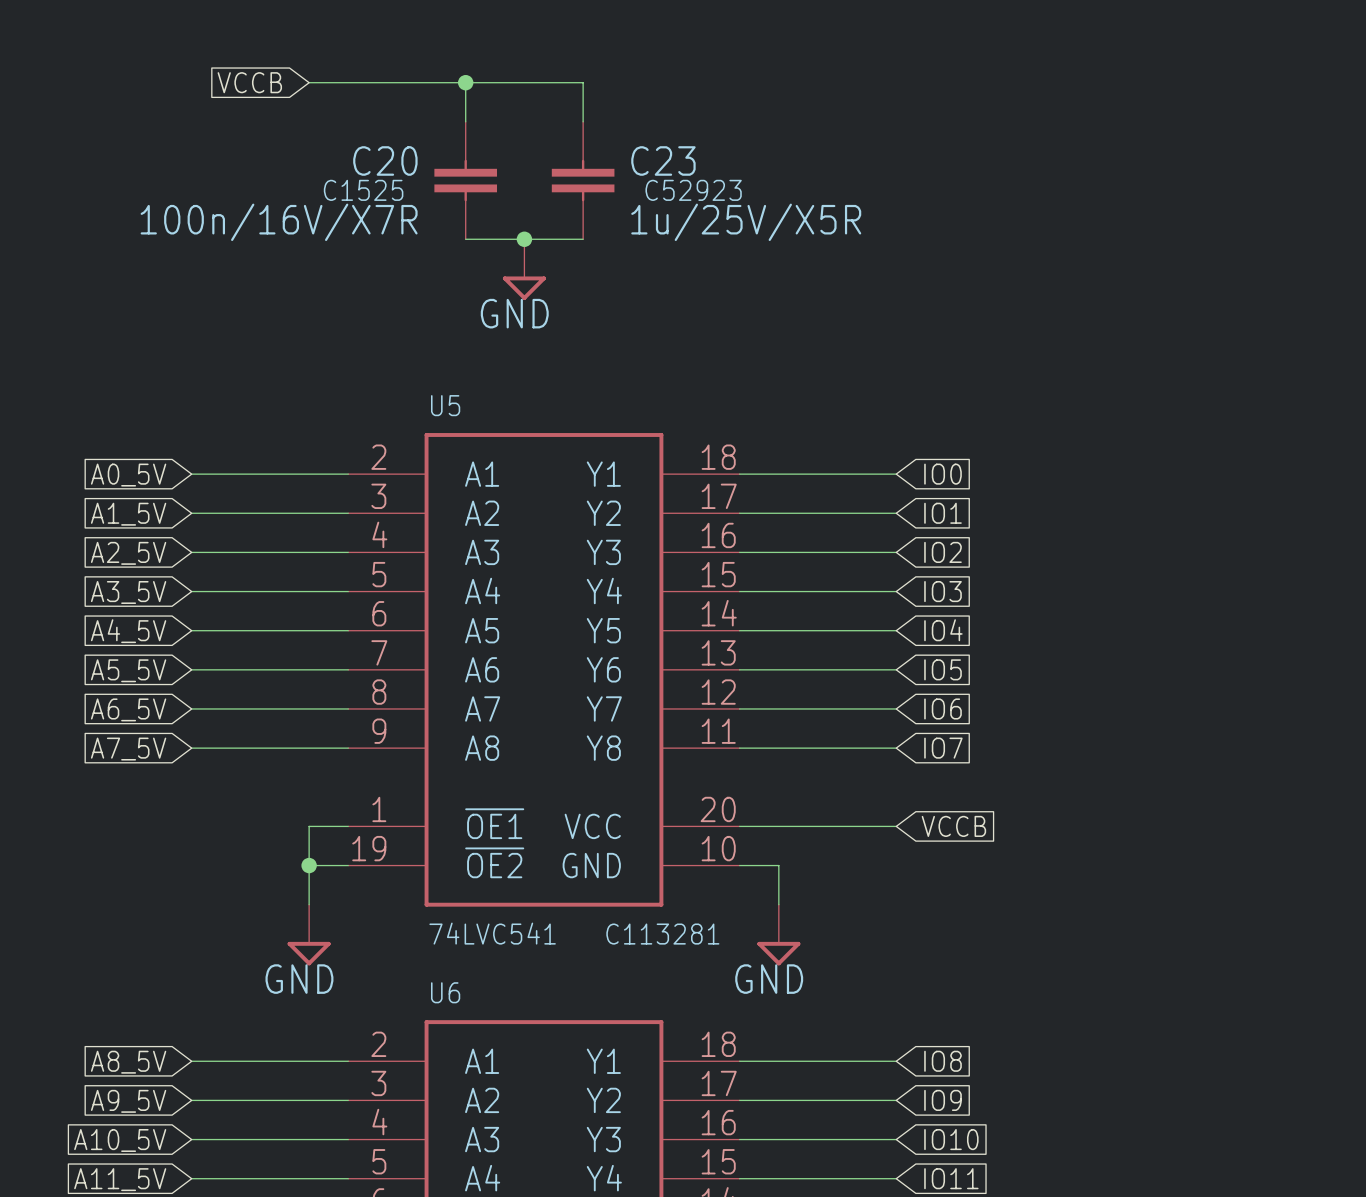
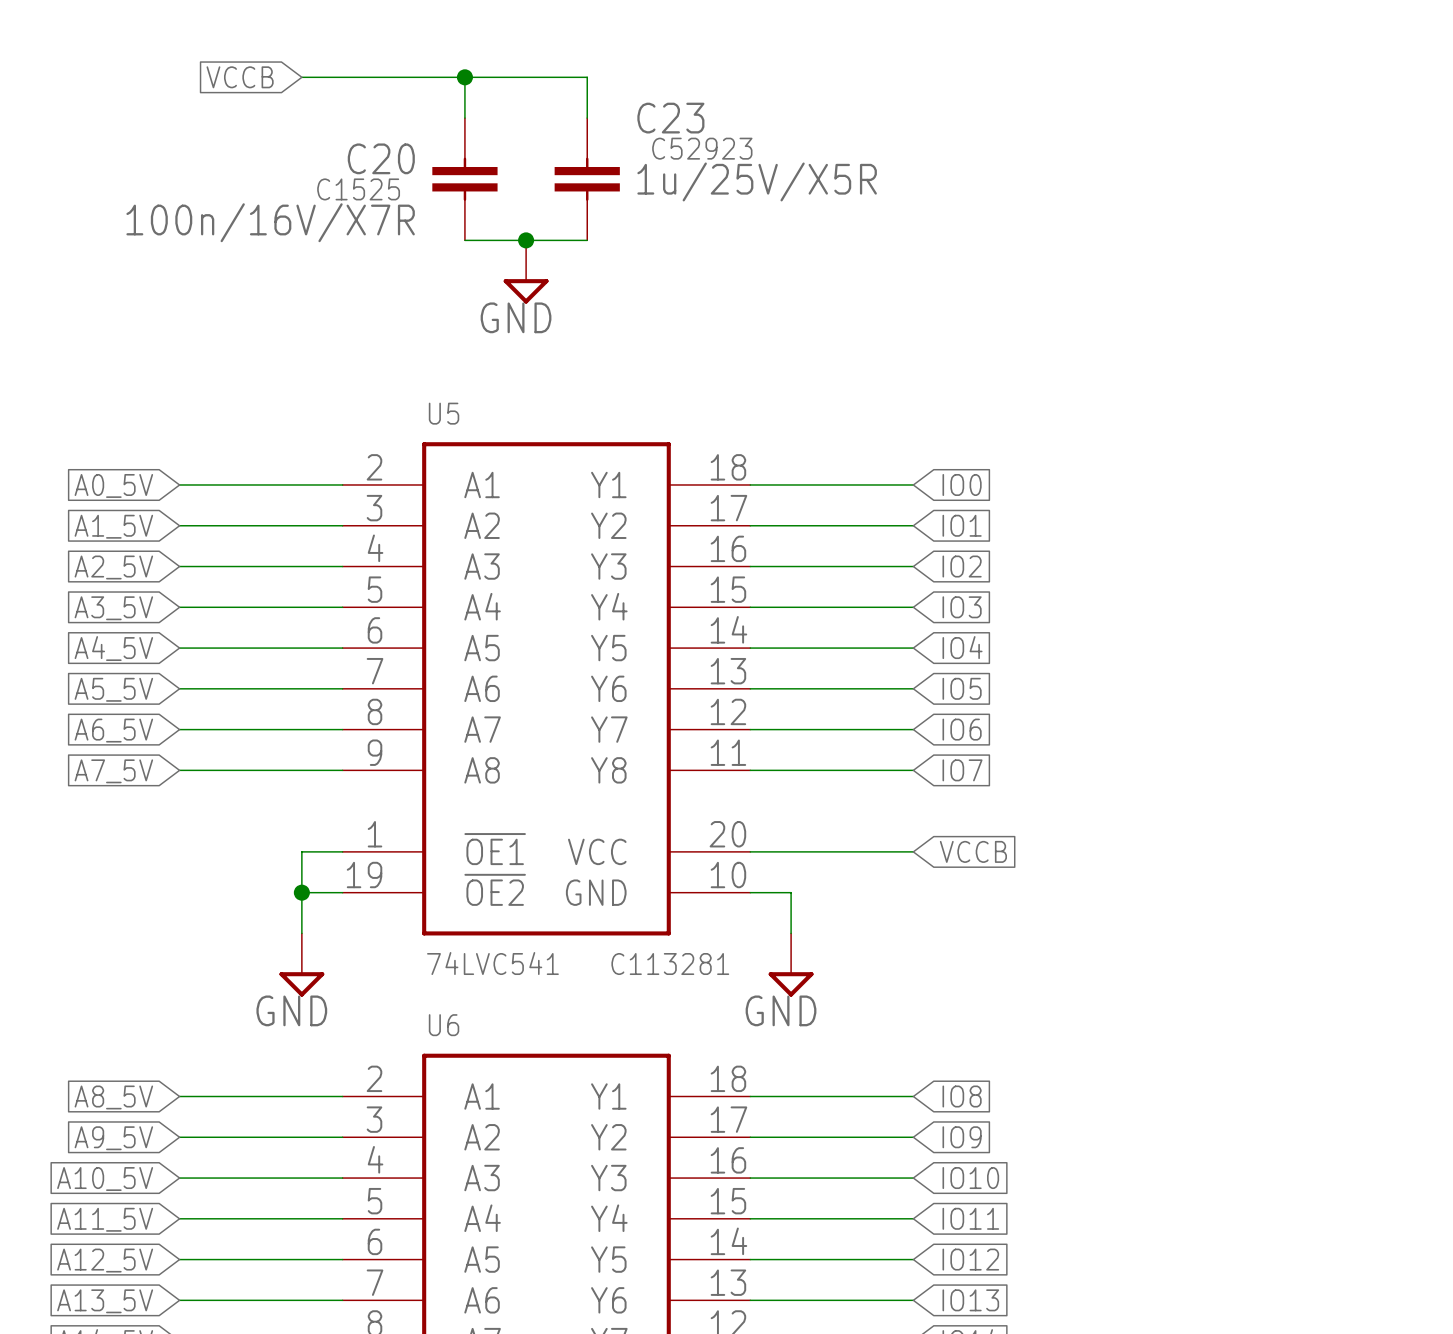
C23 name position: C23 (663, 160) -> C23 (670, 118)
C23 text position: C52923 (693, 190) -> C52923 (702, 148)
C23 value position: 1u/25V/X5R (746, 222) -> 1u/25V/X5R (757, 181)

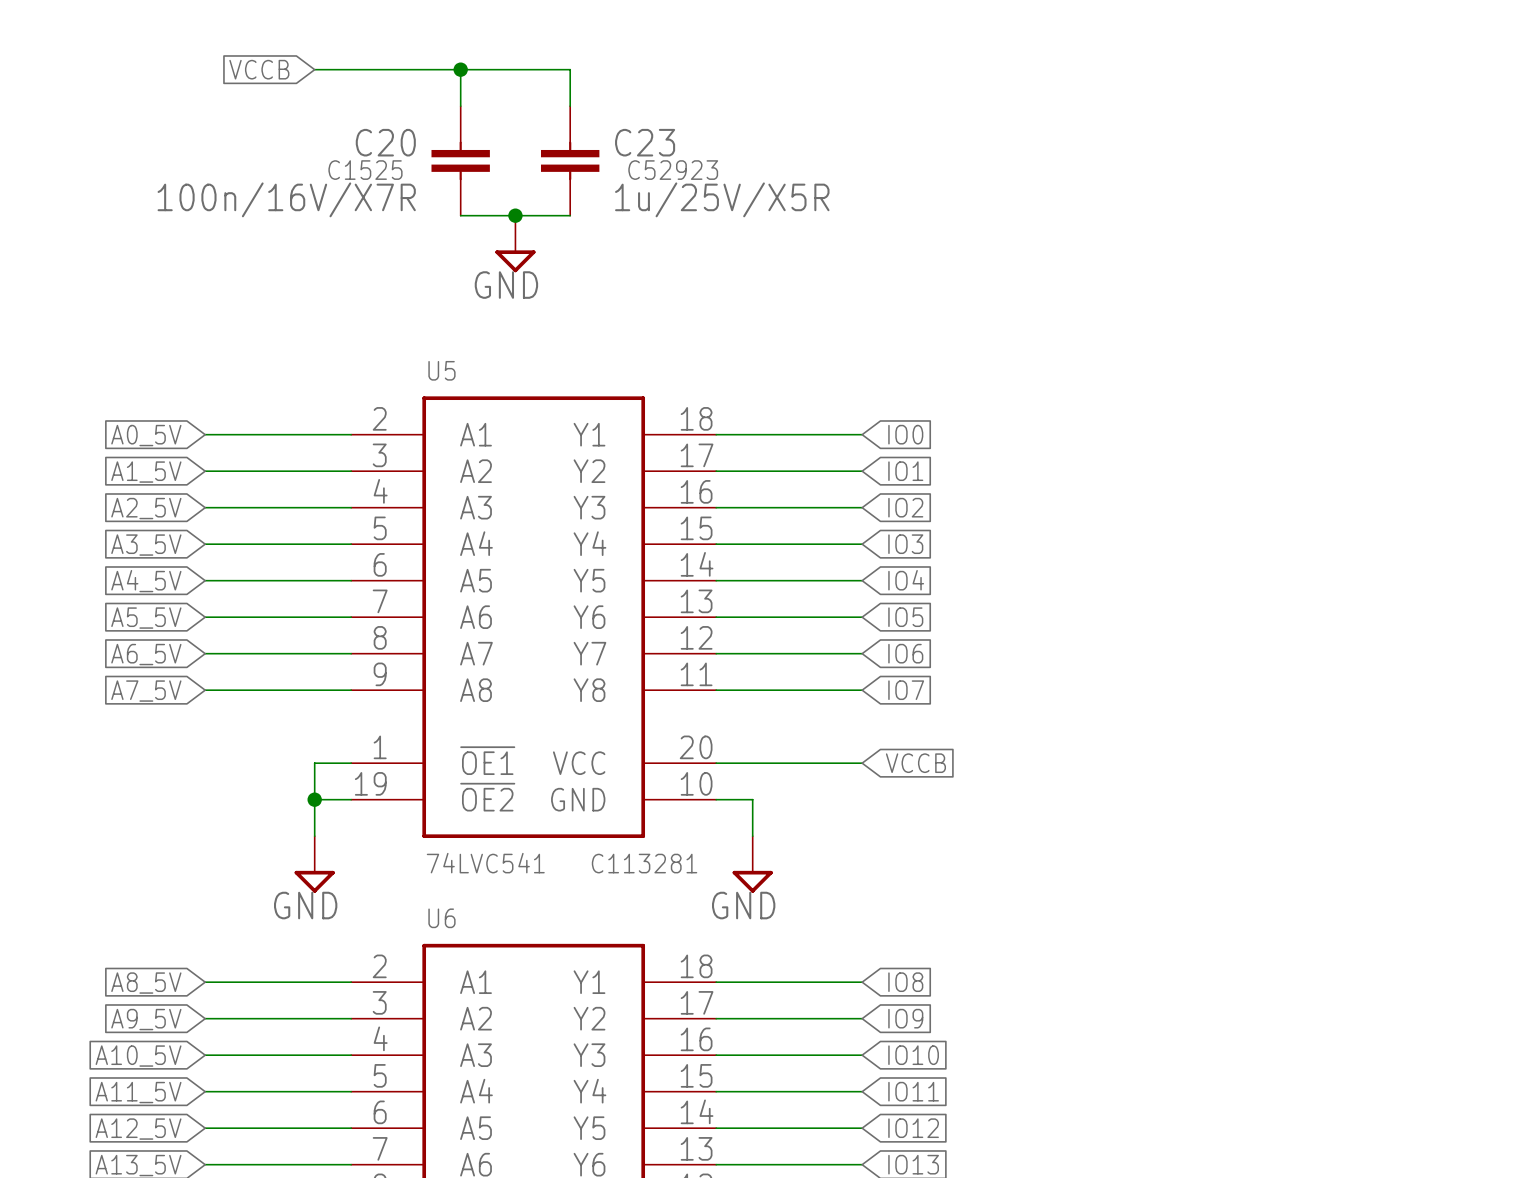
C23 name position: C23 (670, 118) -> C23 (645, 142)
C23 text position: C52923 (702, 148) -> C52923 (673, 170)
C23 value position: 1u/25V/X5R (757, 181) -> 1u/25V/X5R (722, 199)

